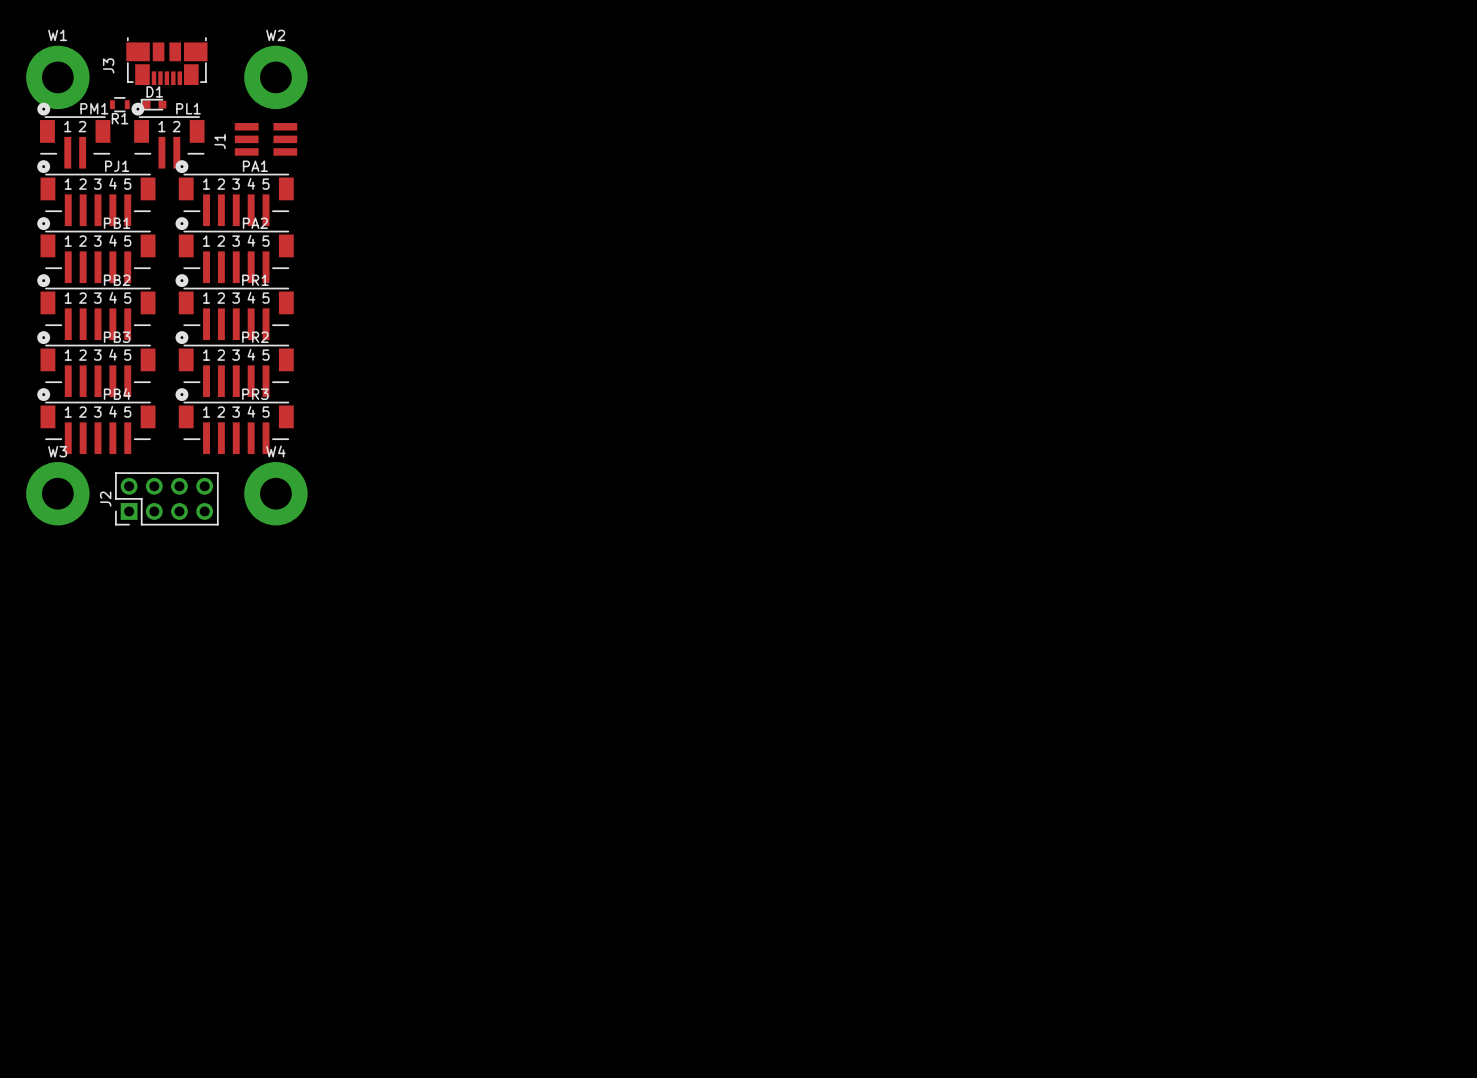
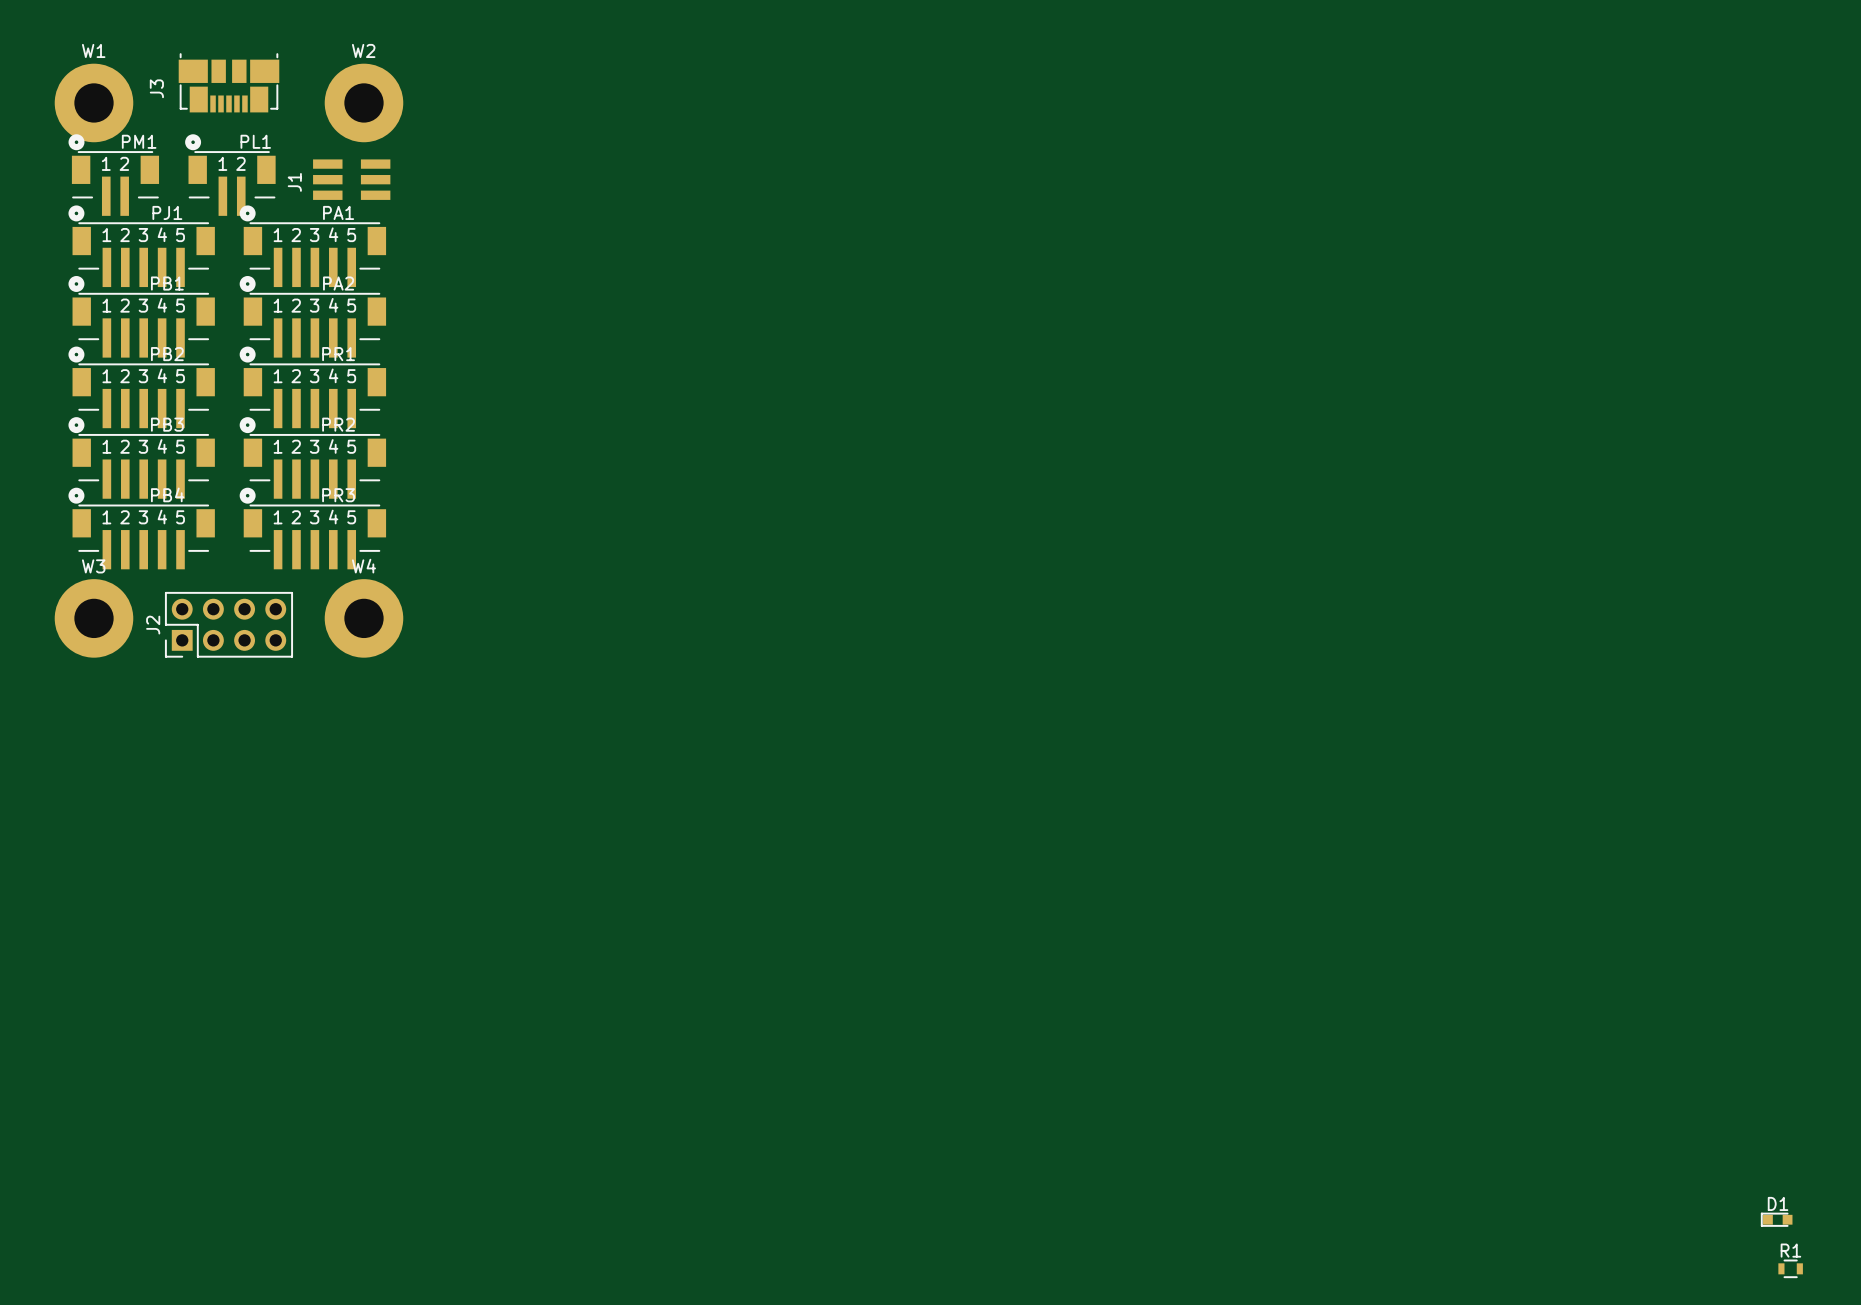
R1 position: (119, 104) -> (1790, 1268)
D1 position: (153, 104) -> (1776, 1219)
R1 name position: R1 (120, 118) -> R1 (1790, 1250)

